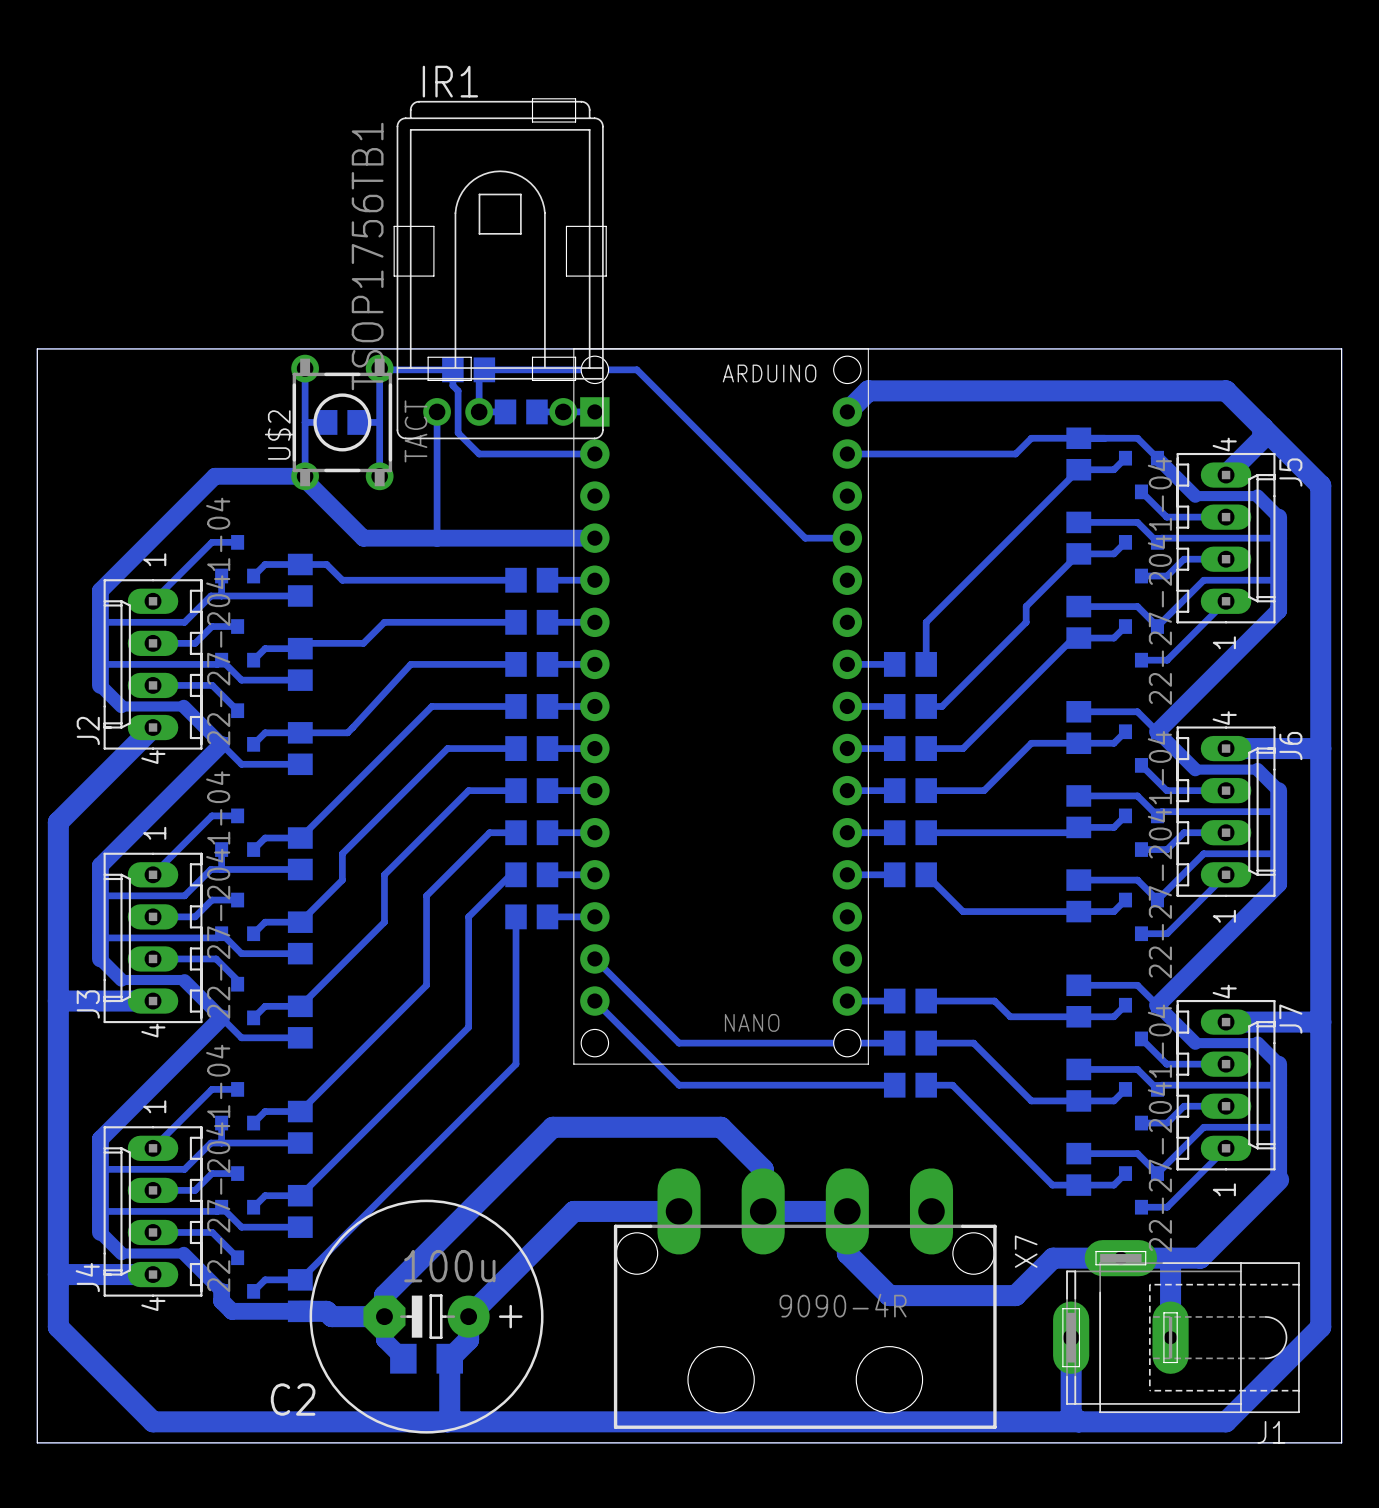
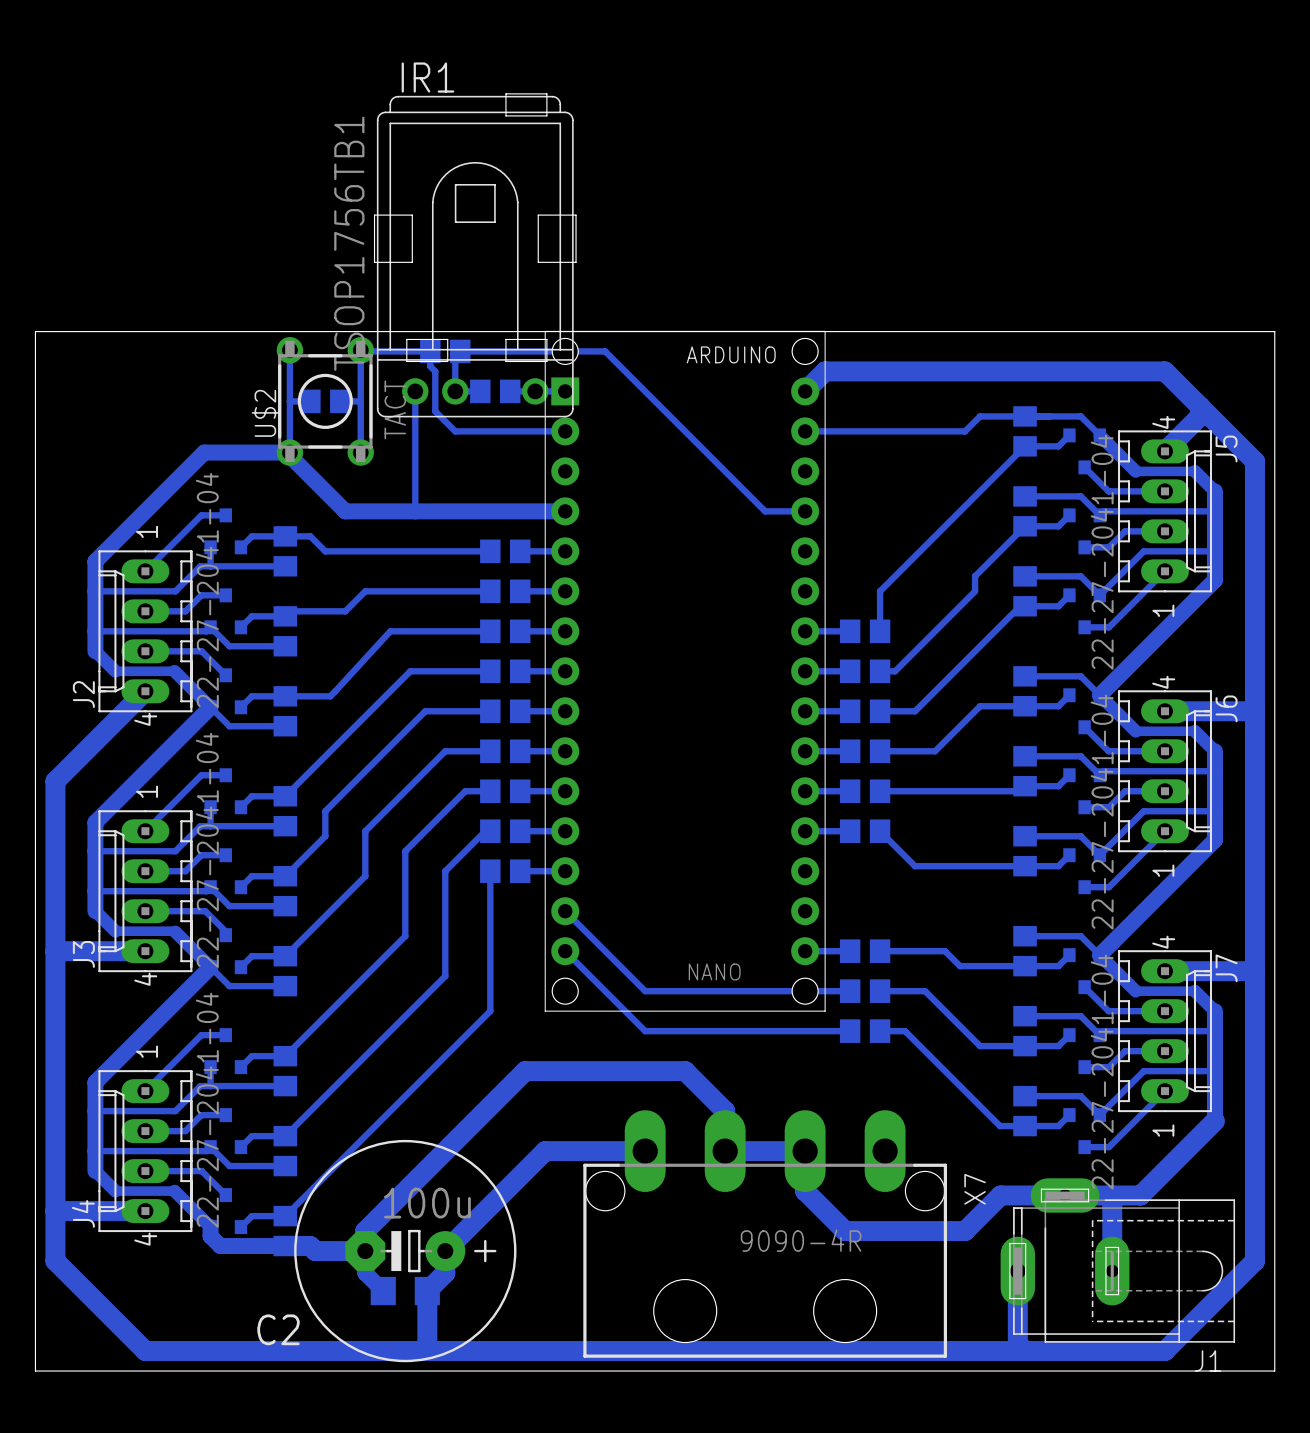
bottom track: (37, 348) (37, 1442) (1341, 1442) (1341, 348) (37, 348) -> none

